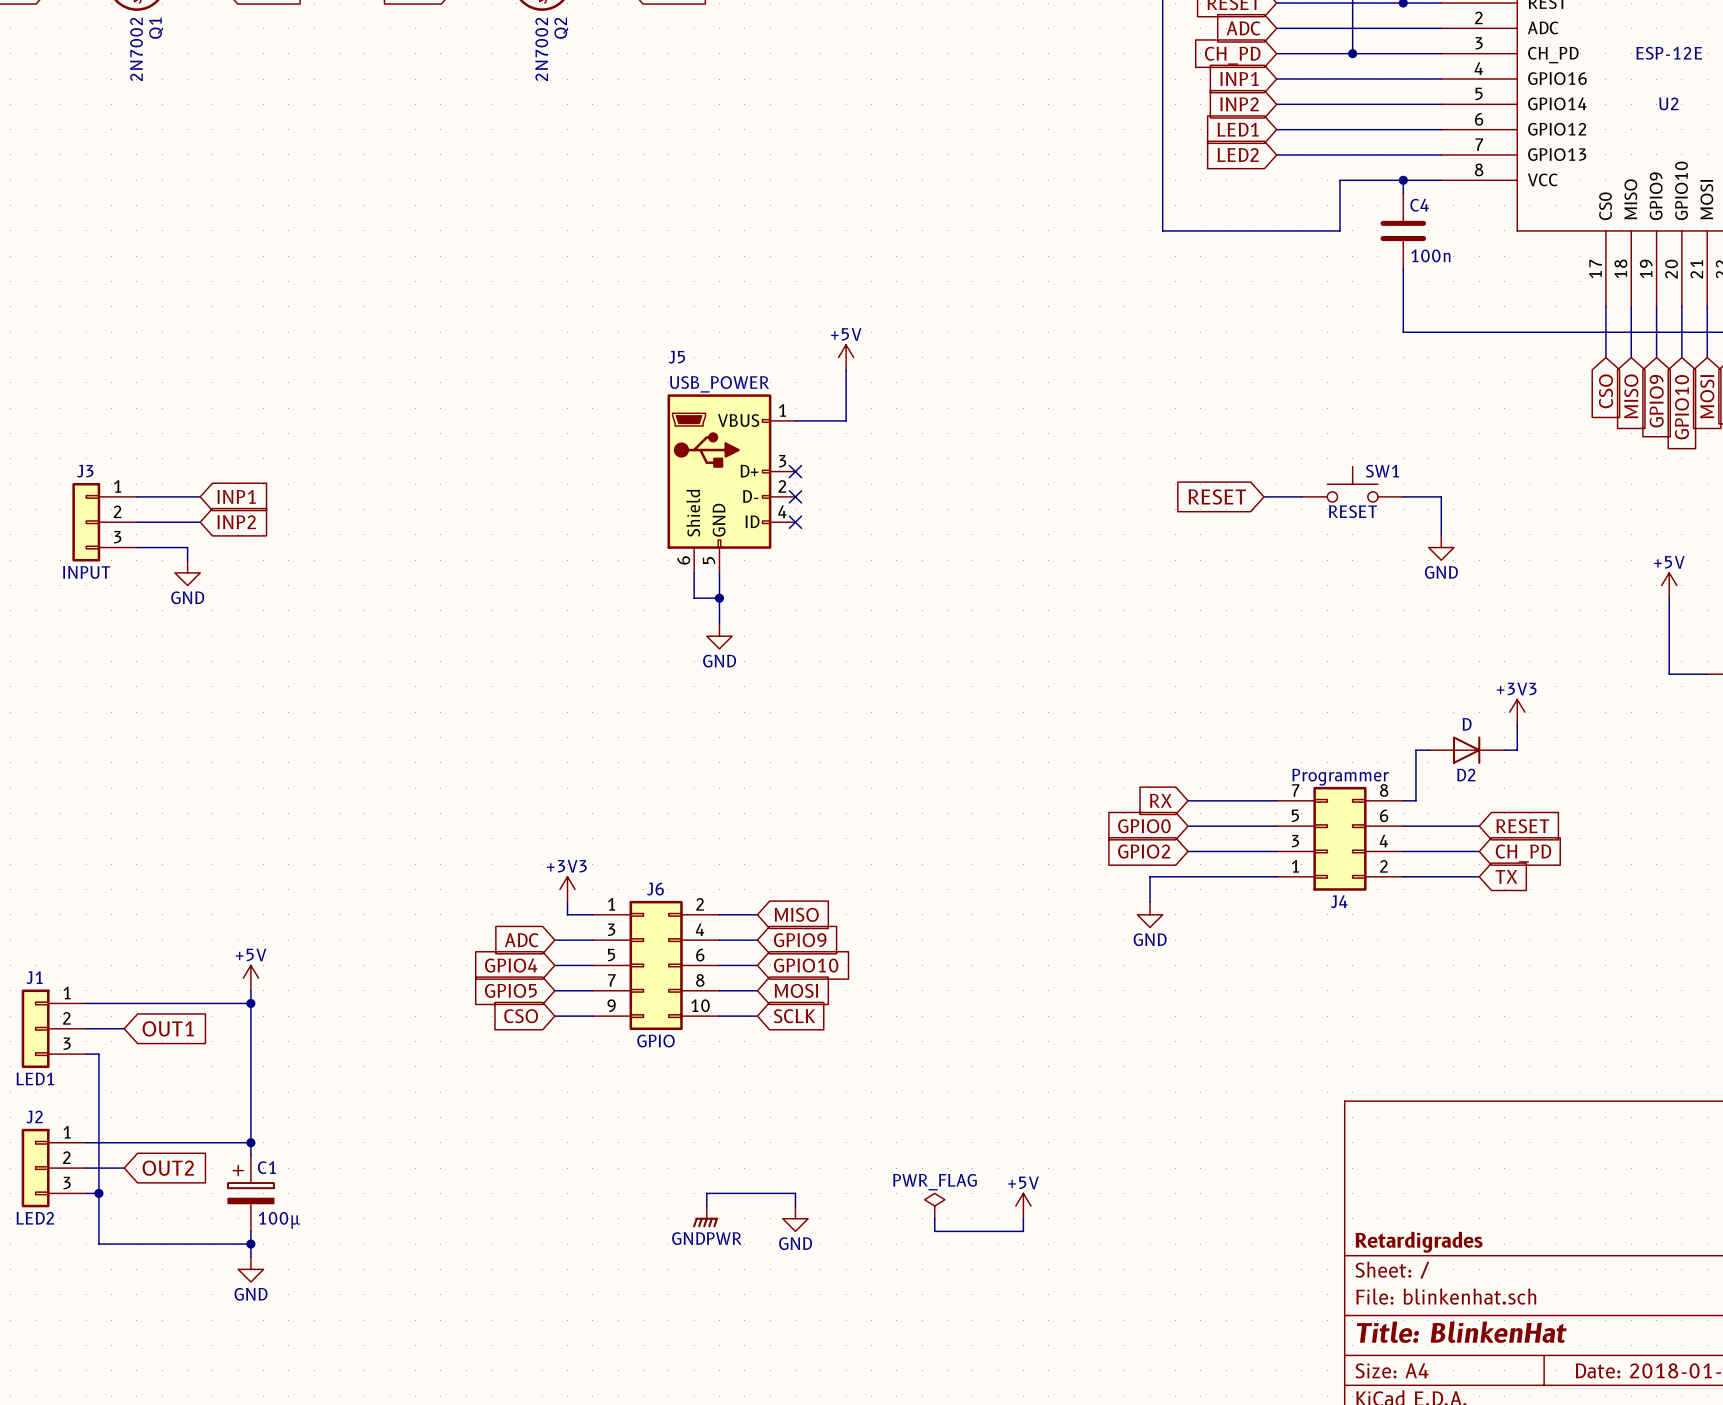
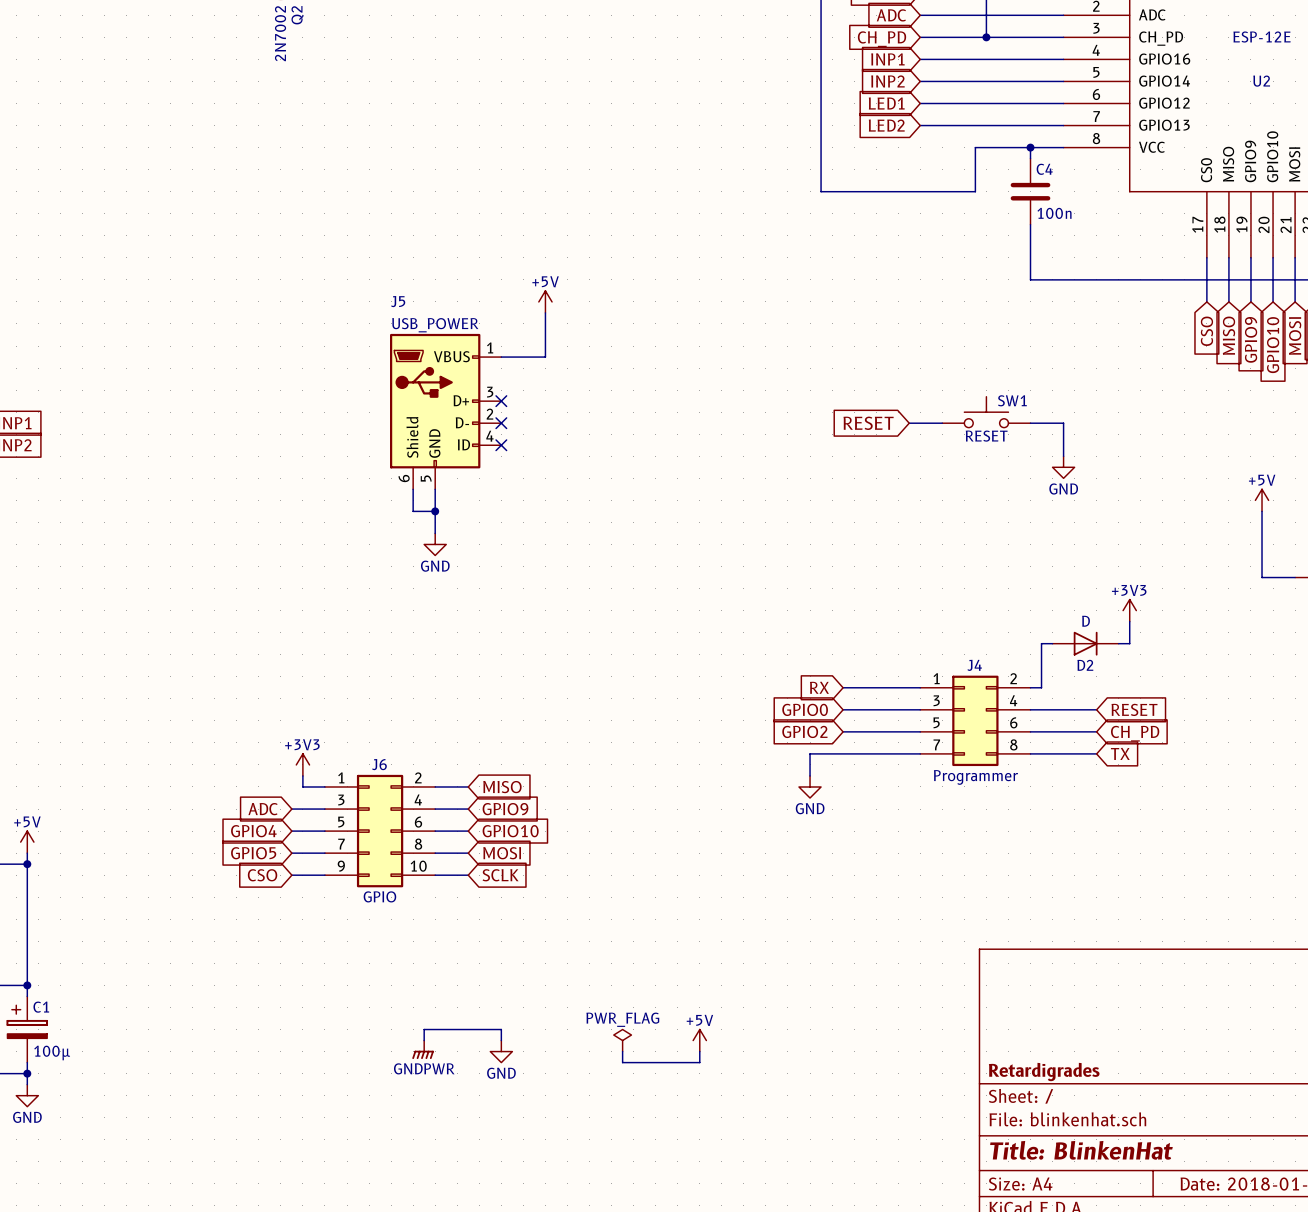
J4 flip: as is (1339, 838) -> up-down (975, 720)

